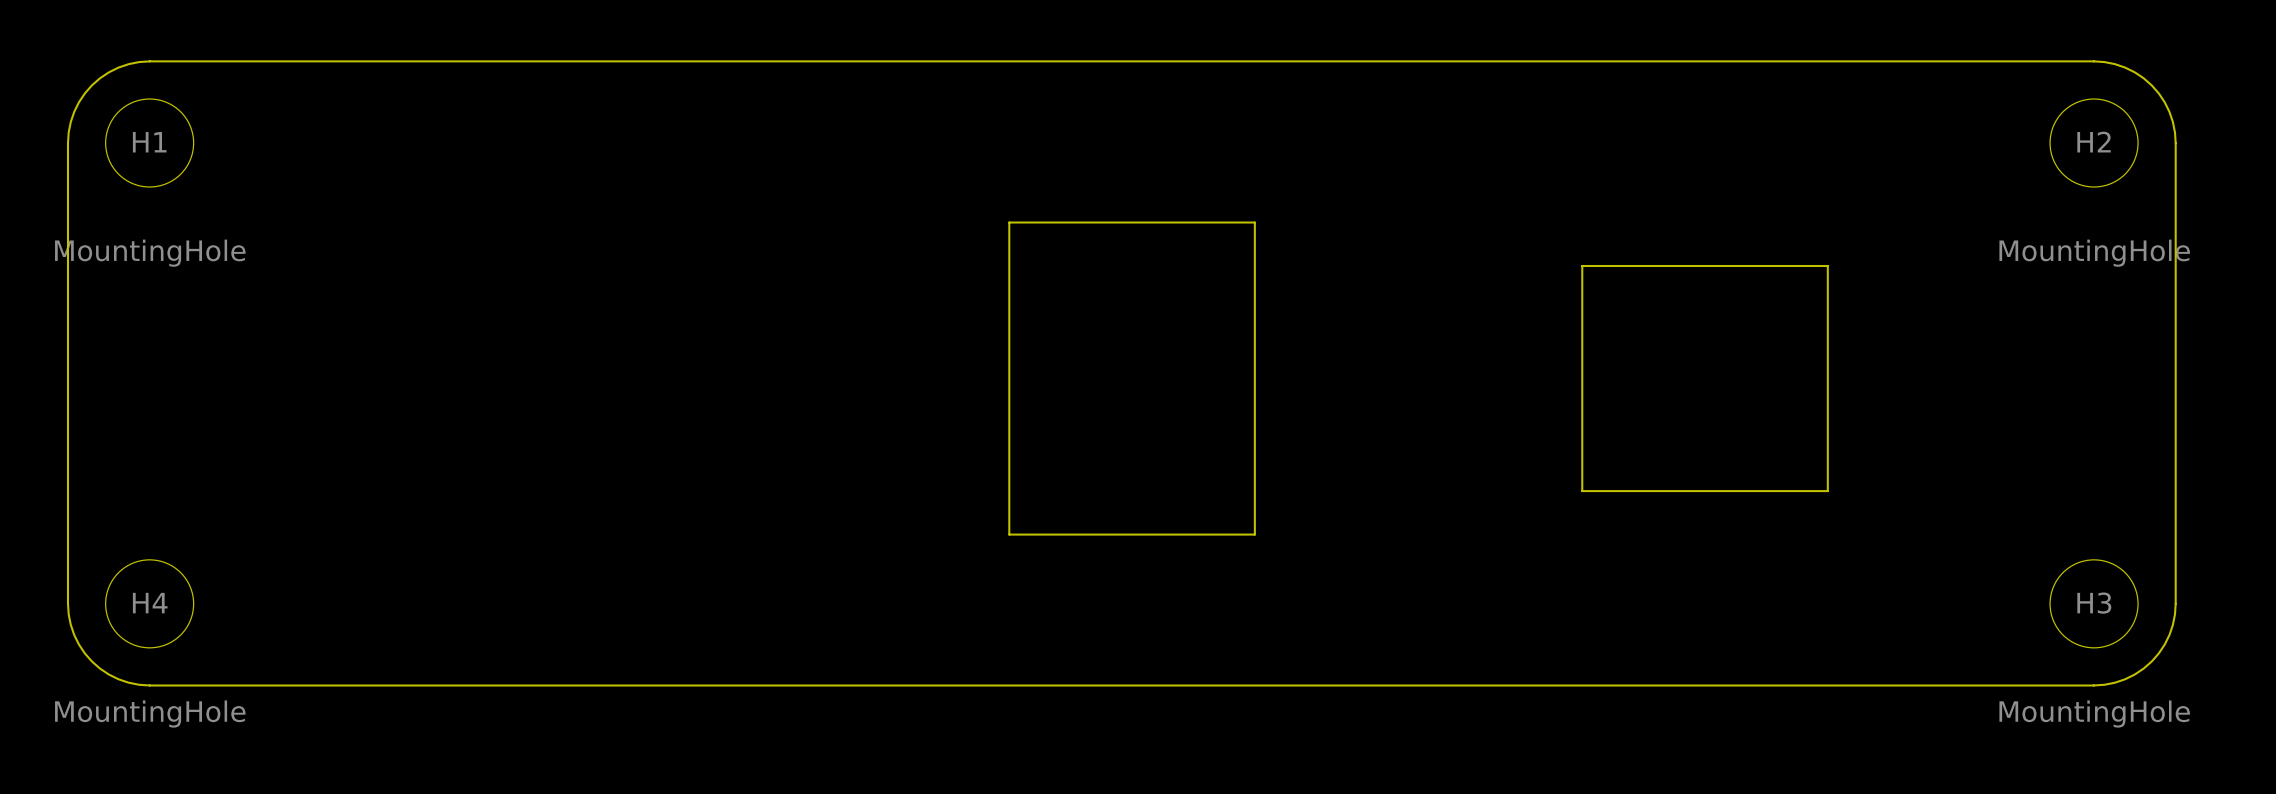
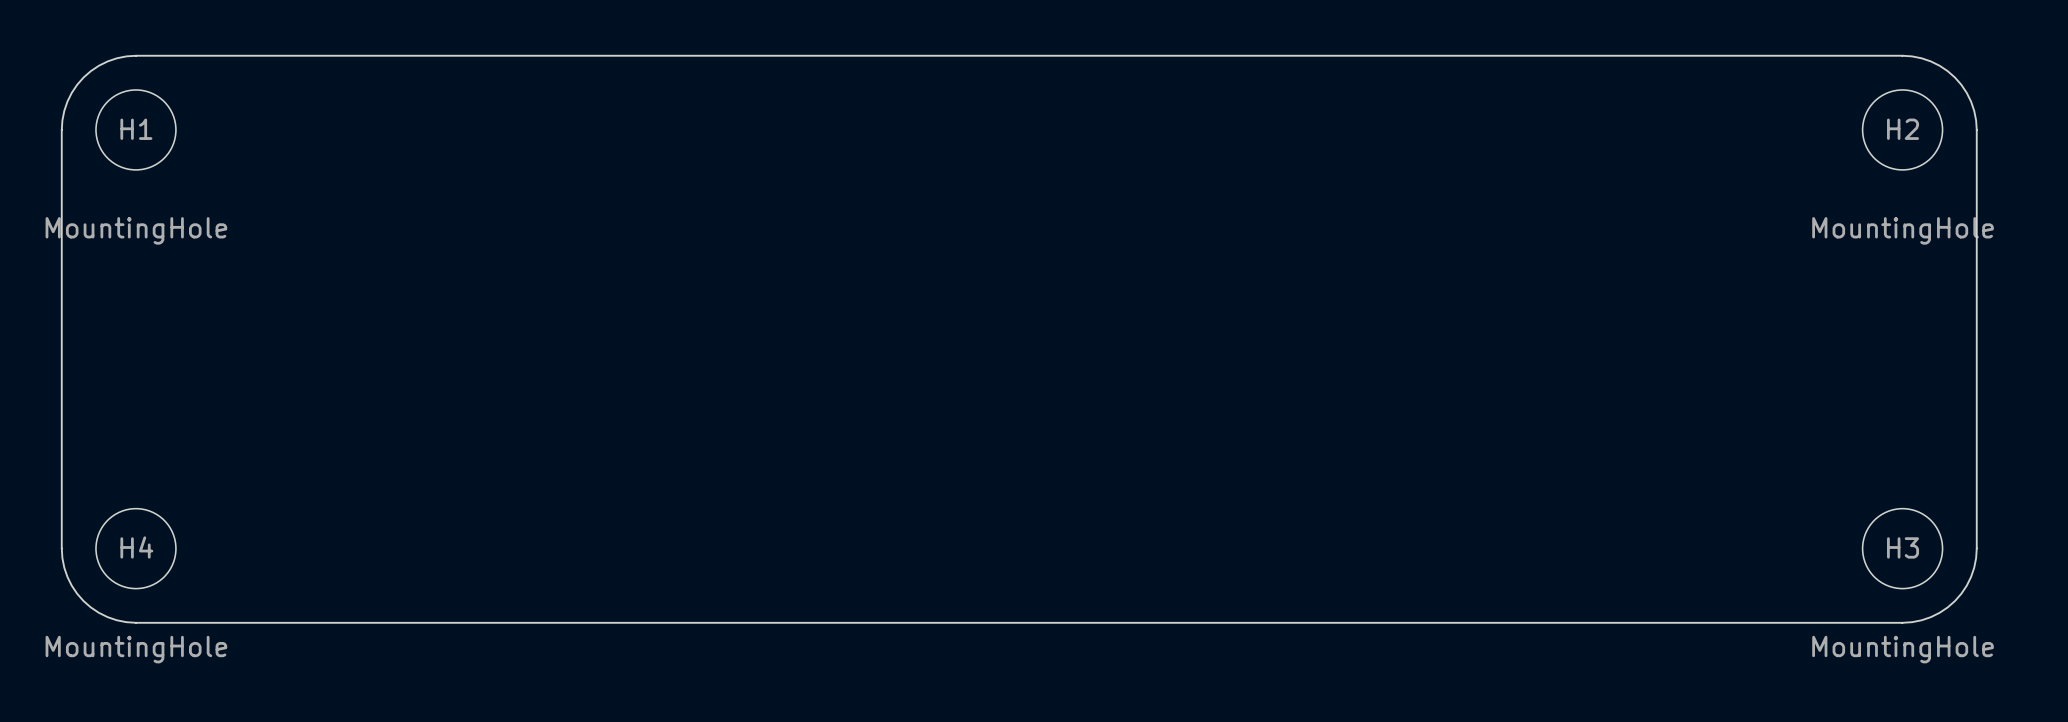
board edge: (1009, 222) (1254, 222) (1254, 534) (1009, 534) (1009, 222) -> none
board edge: (1582, 265) (1827, 265) (1827, 491) (1582, 491) (1582, 265) -> none

